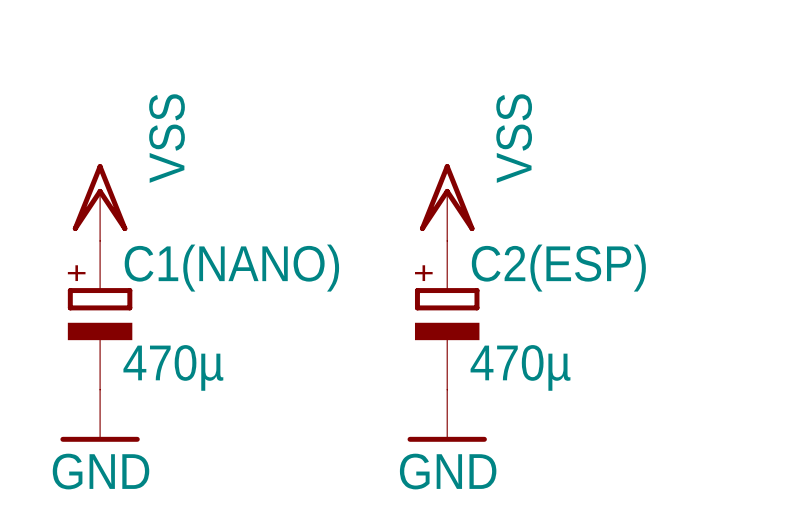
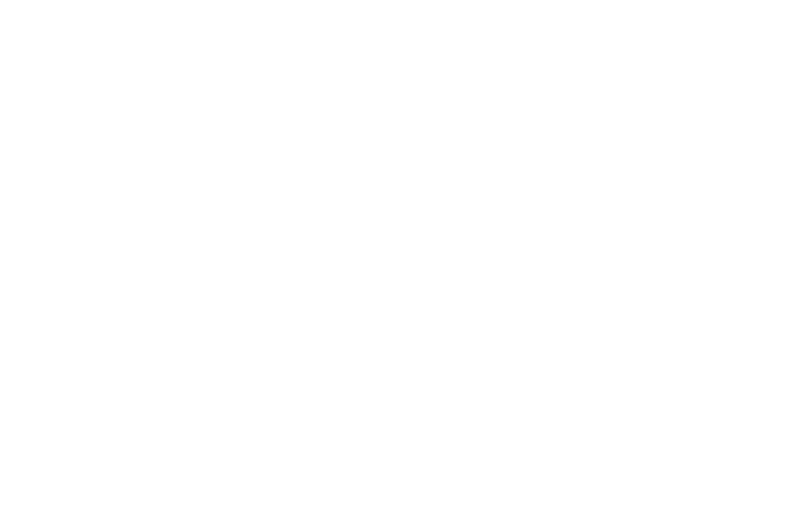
power symbol: VSS (100, 202) -> none
power symbol: VSS (447, 202) -> none
C1(NANO): 470µ (100, 315) -> none
C2(ESP): 470µ (447, 315) -> none
power symbol: GND (100, 415) -> none
power symbol: GND (447, 415) -> none

